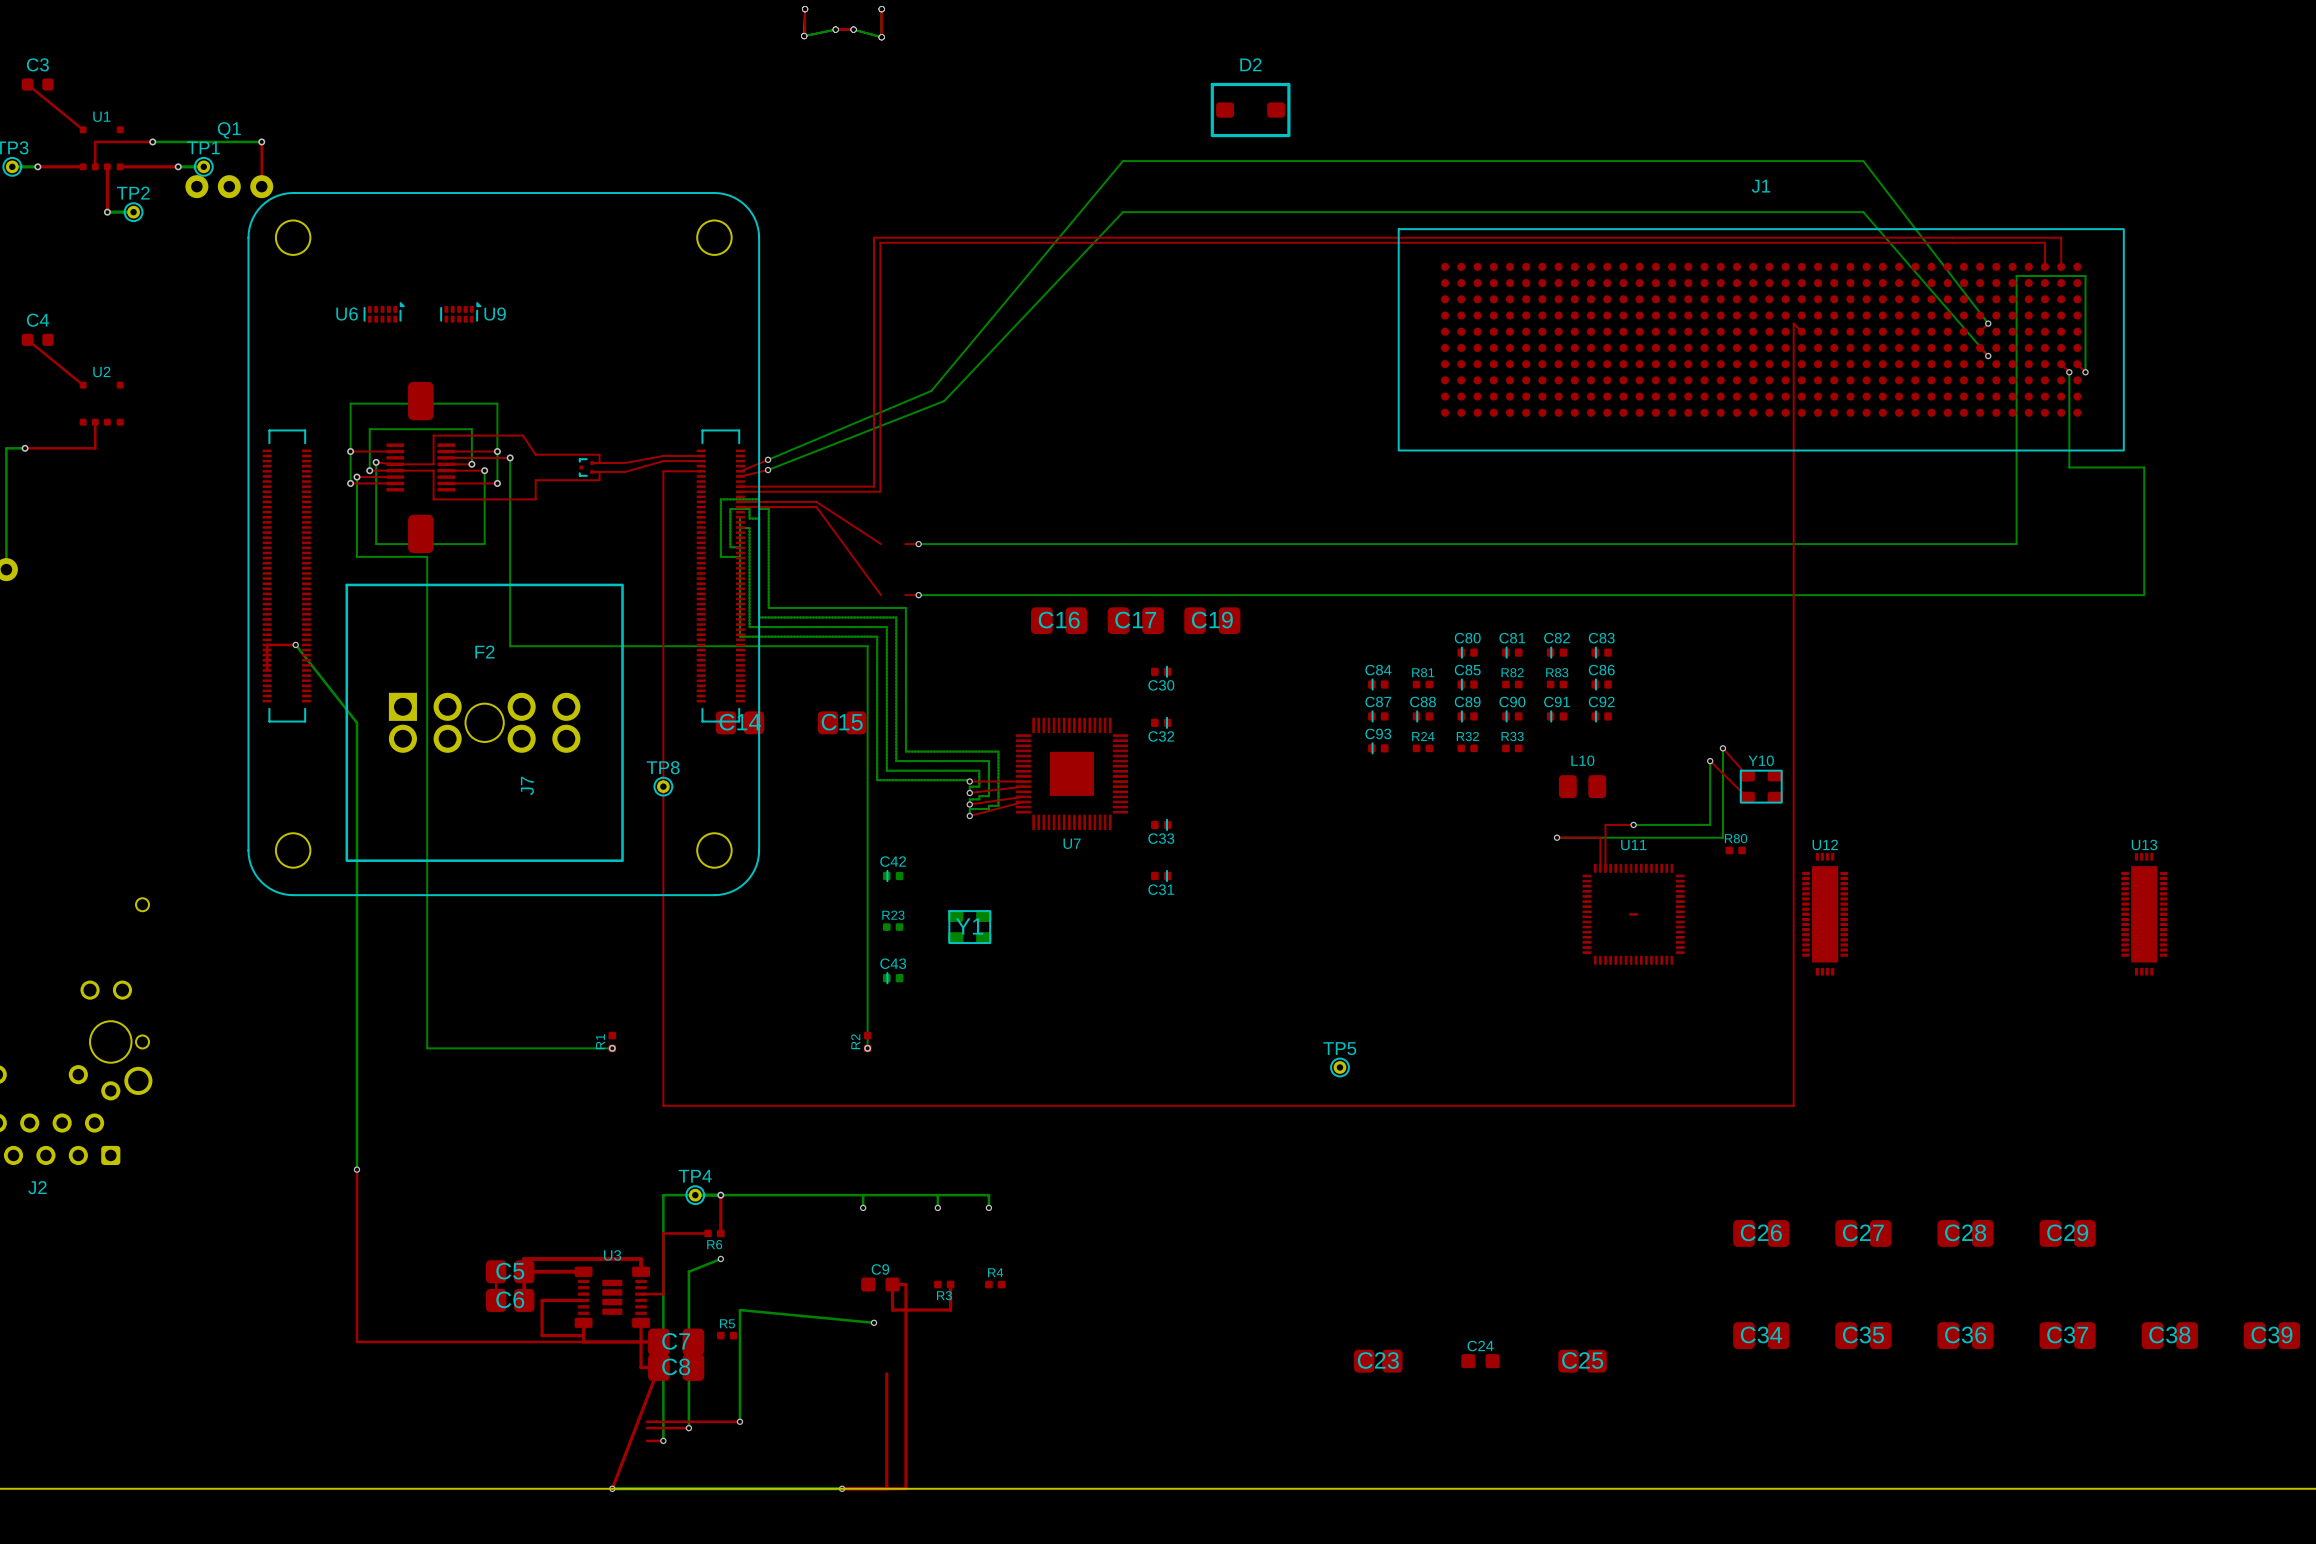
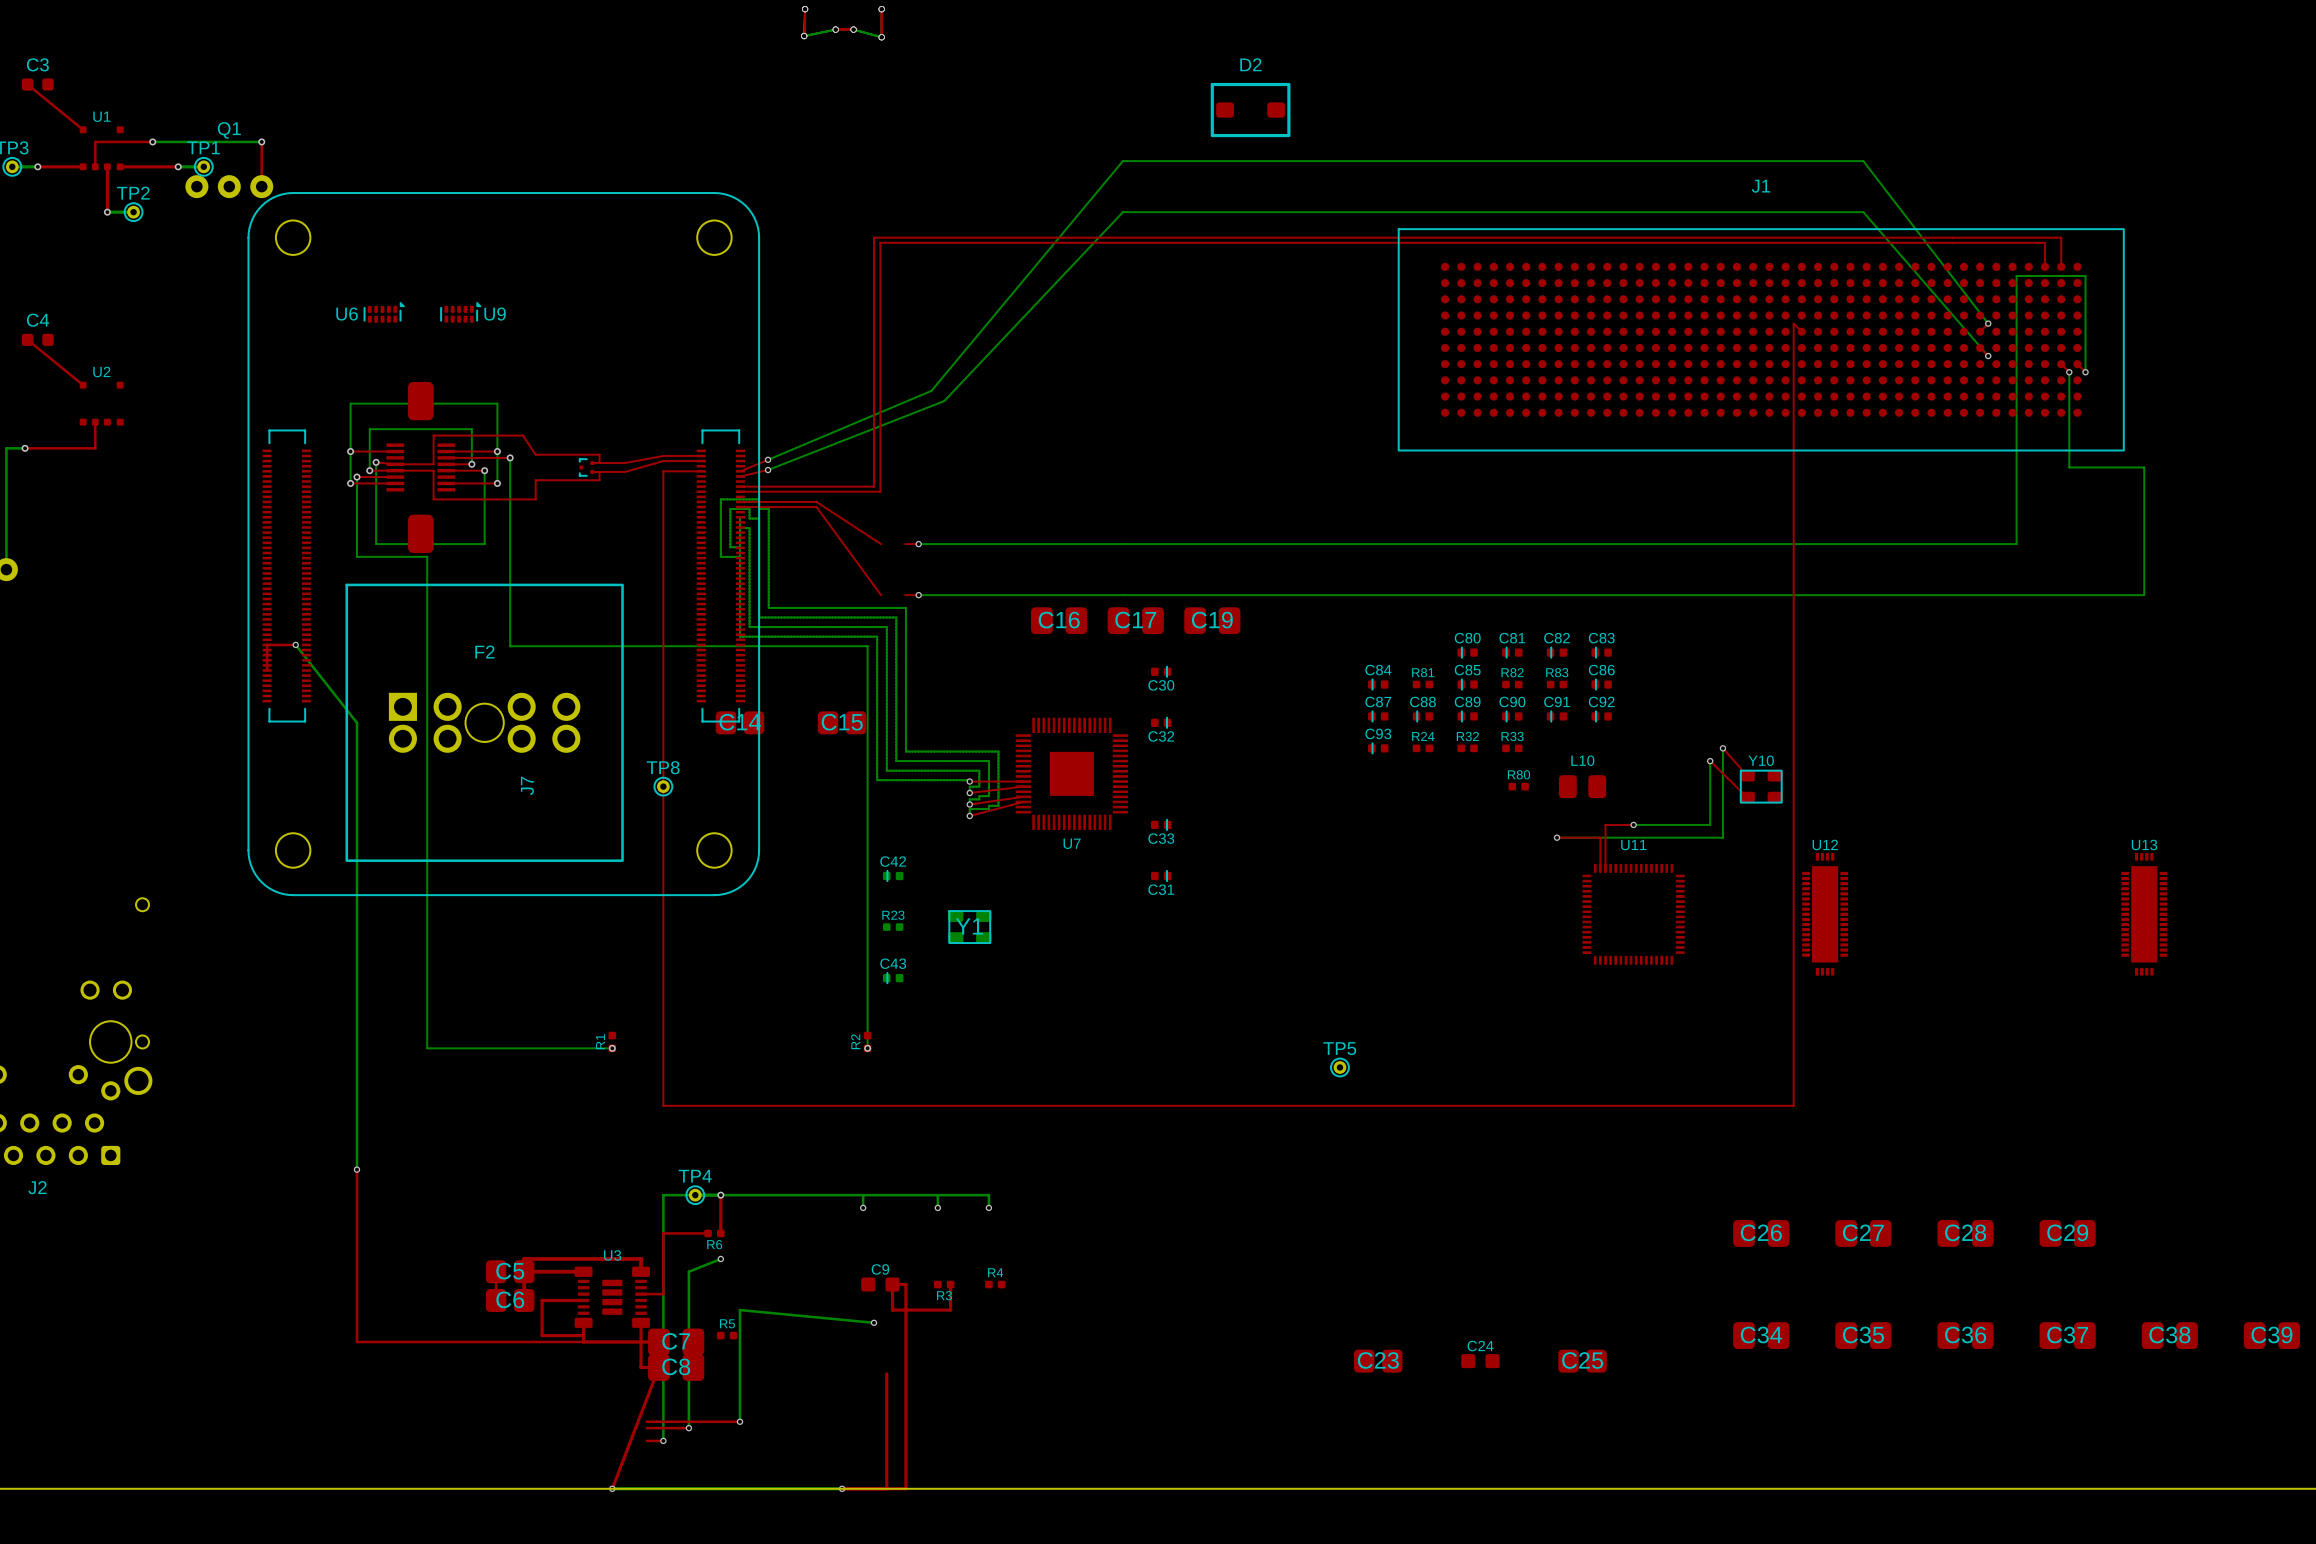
R80 position: (1735, 850) -> (1518, 786)
U11 footprint: [1582, 863, 1685, 965] -> [1582, 863, 1685, 965]

